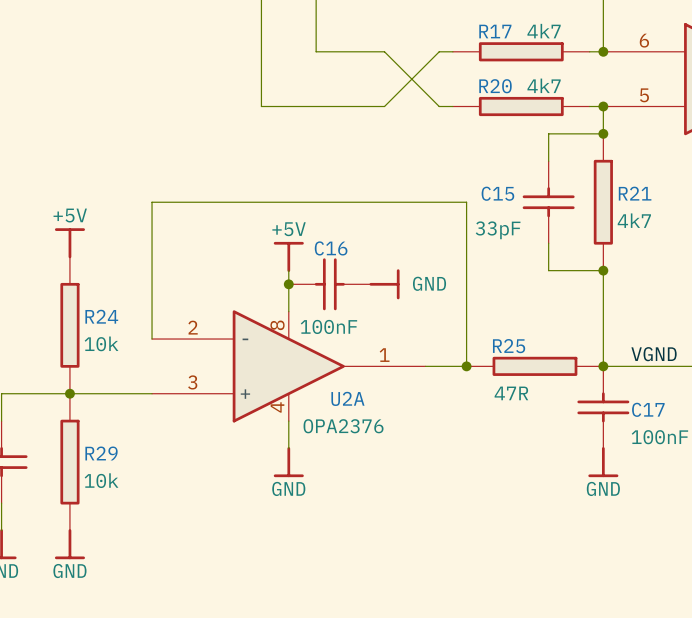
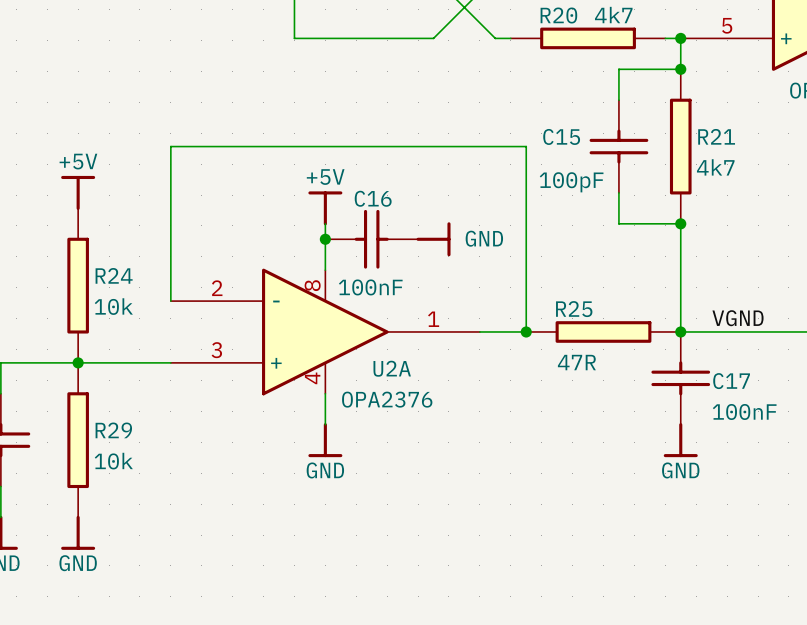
C15 value: 33pF (498, 230) -> 100pF (571, 182)

